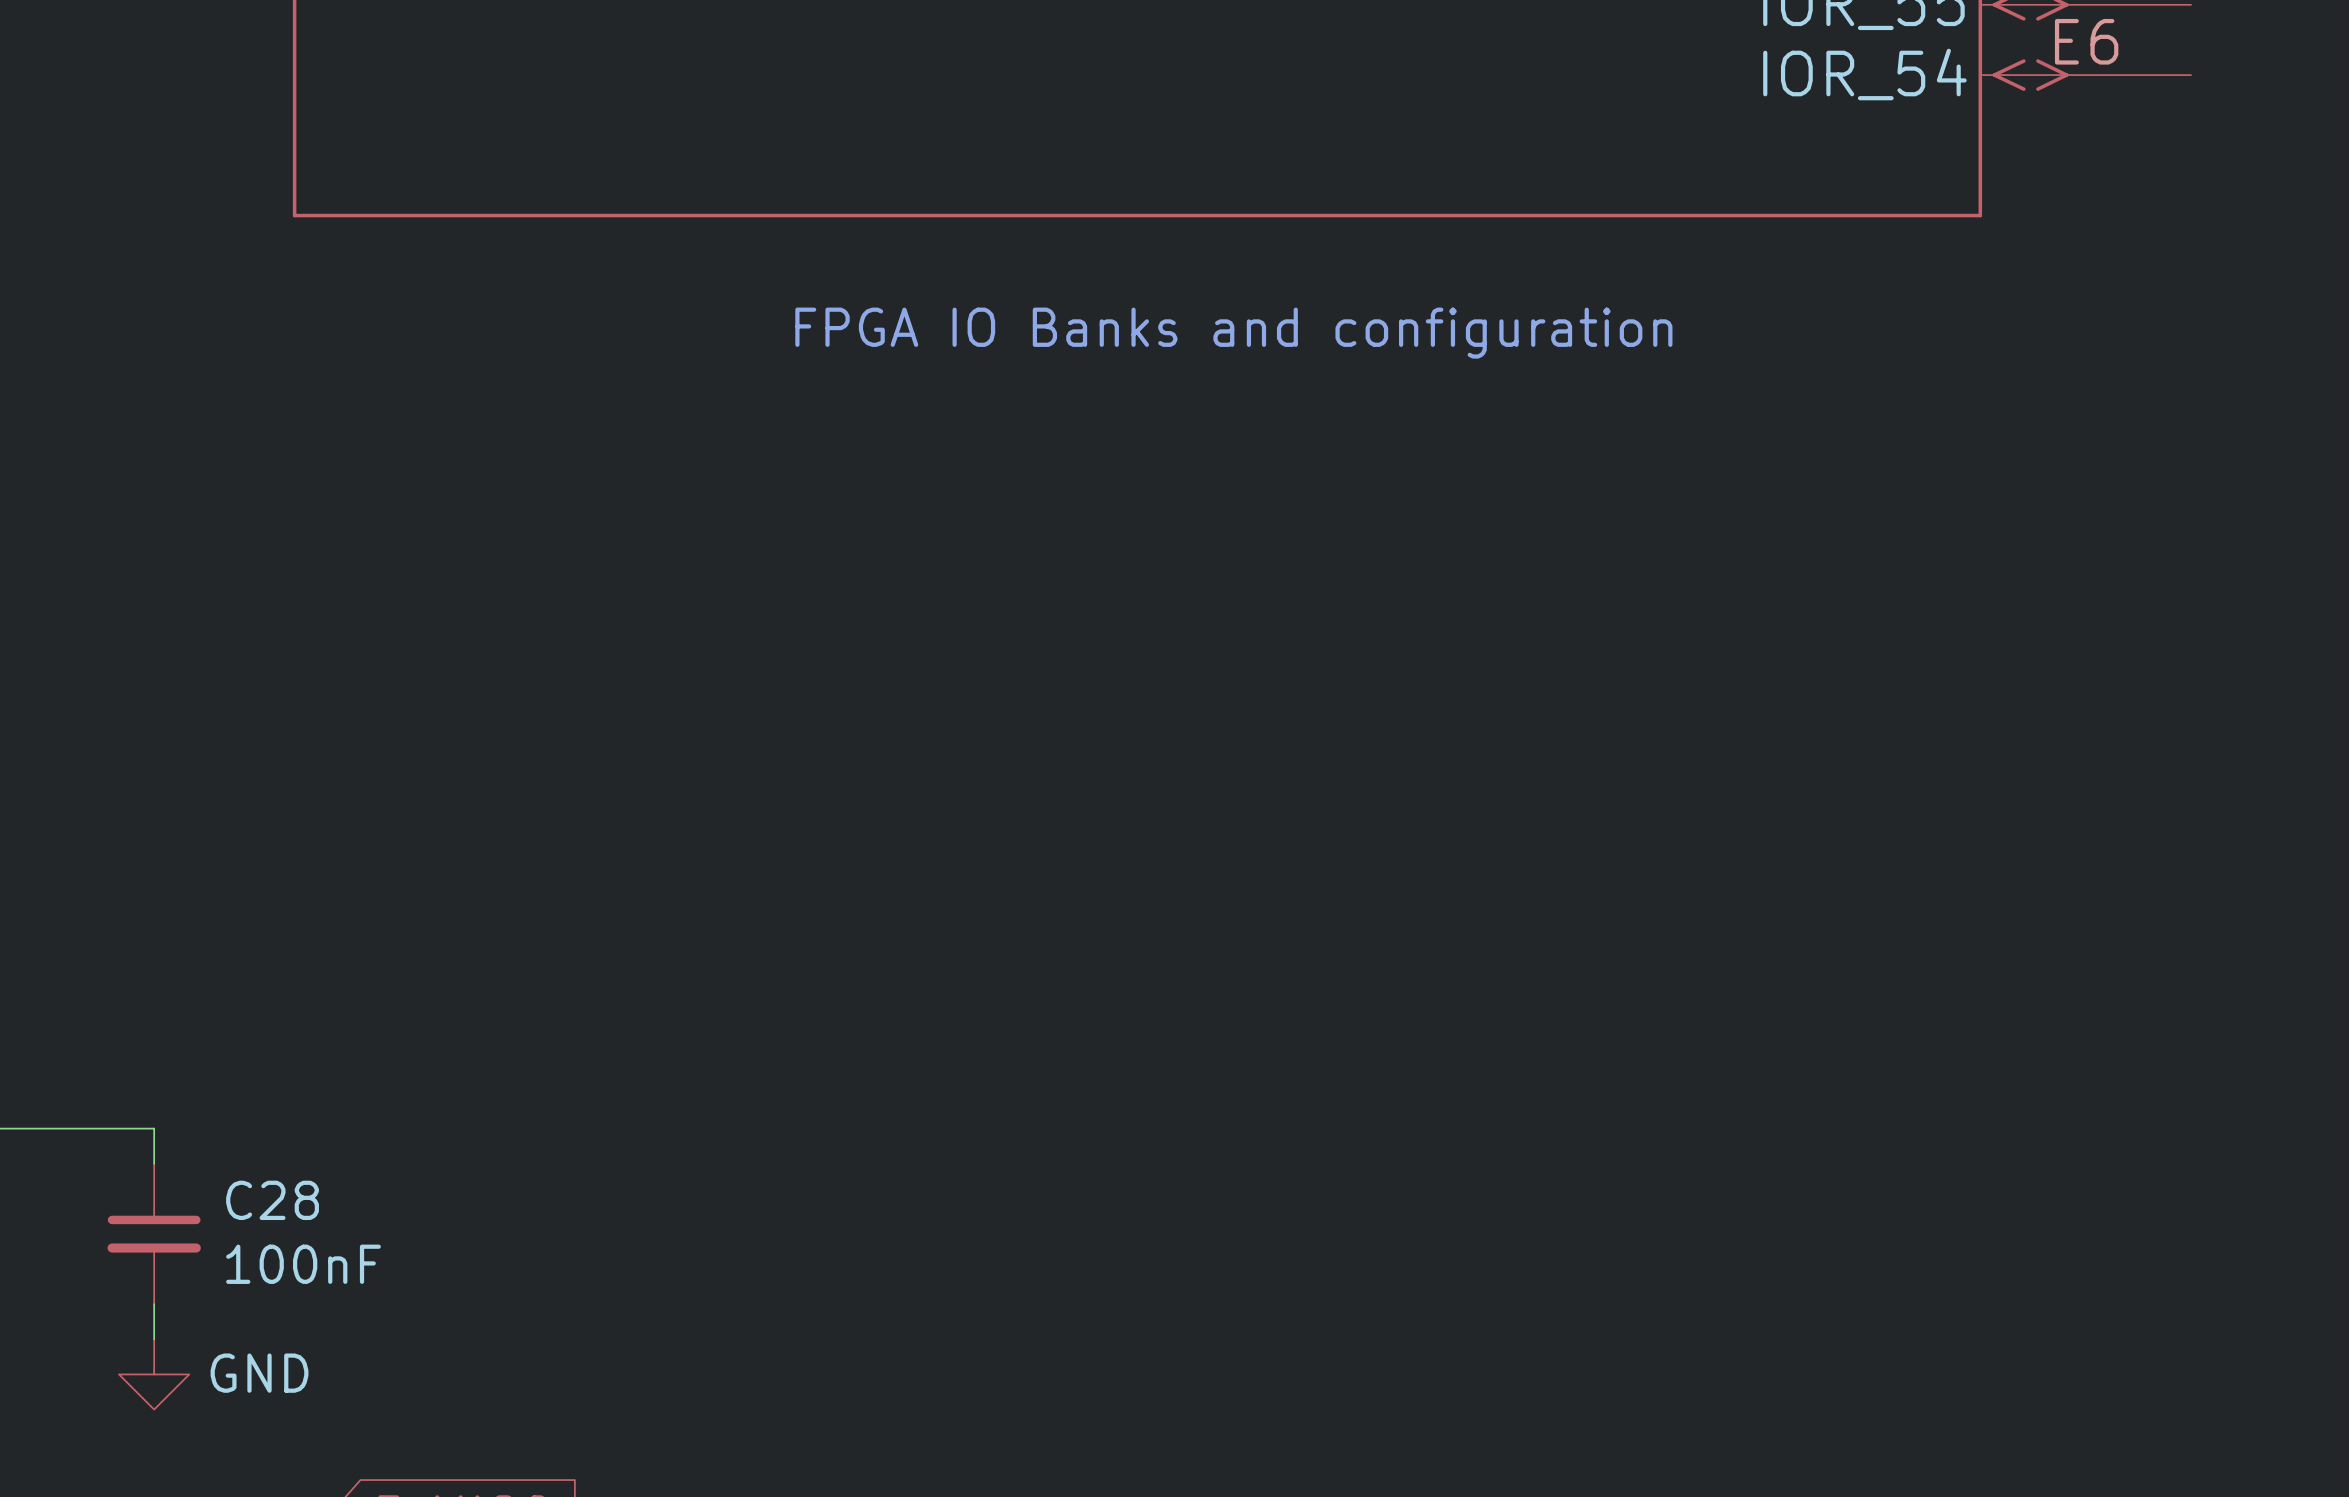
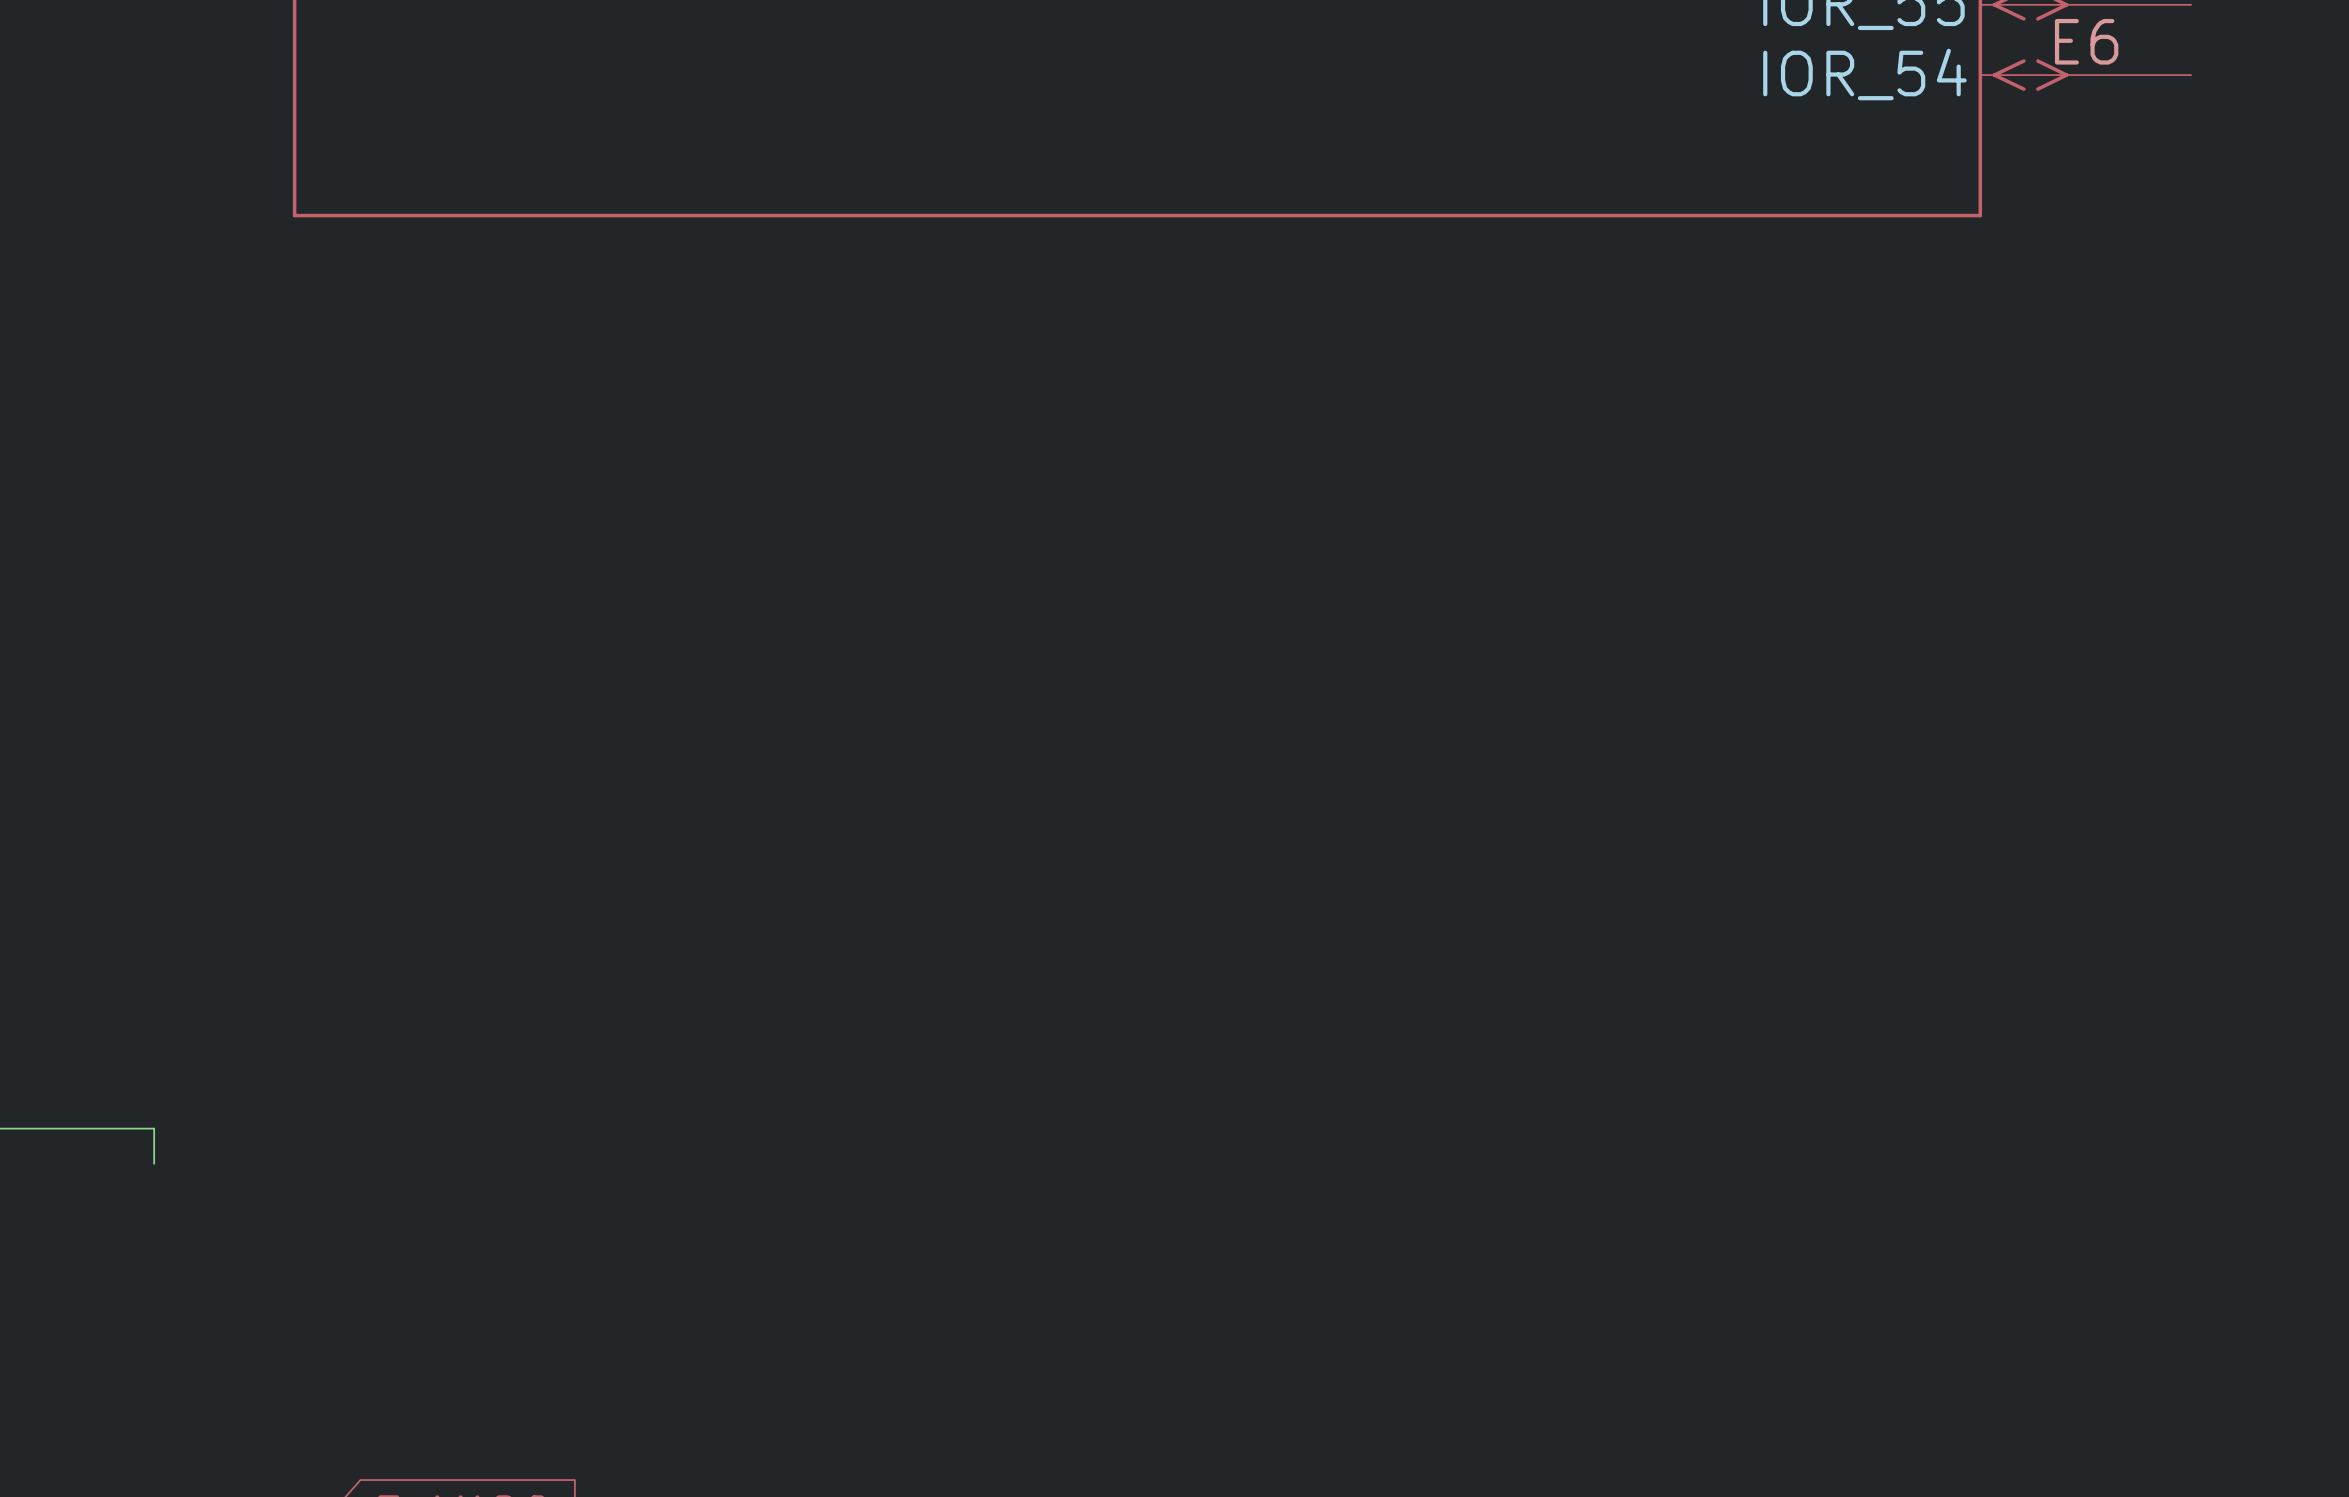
text: FPGA IO Banks and configuration (1233, 333) -> none
C28: 100nF (154, 1233) -> none
wire: (154, 1304) (154, 1339) -> none
power symbol: GND (154, 1374) -> none

